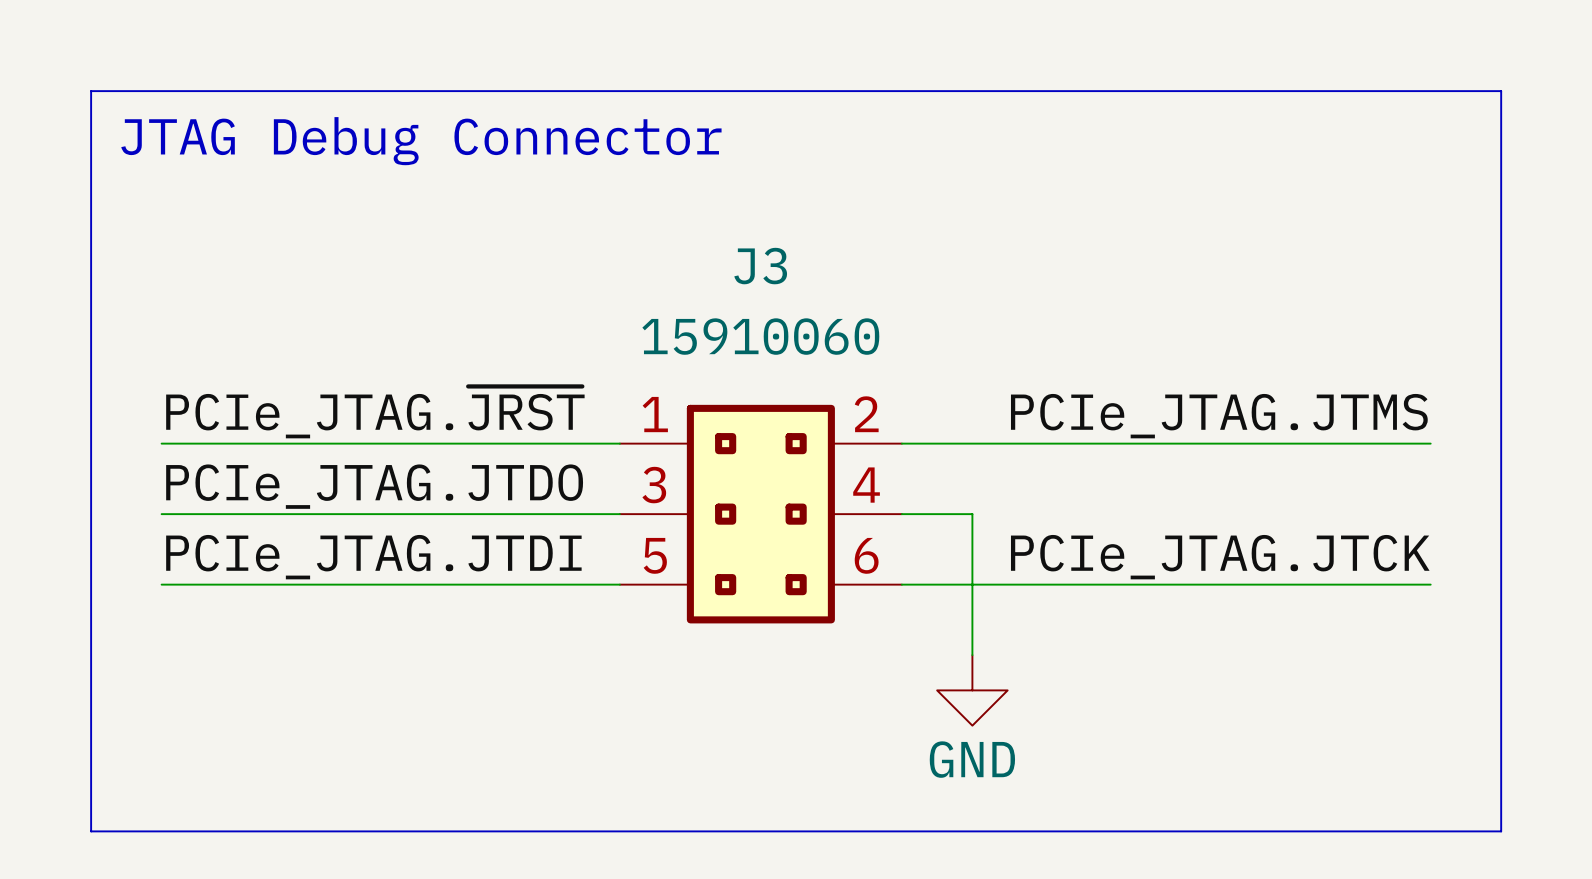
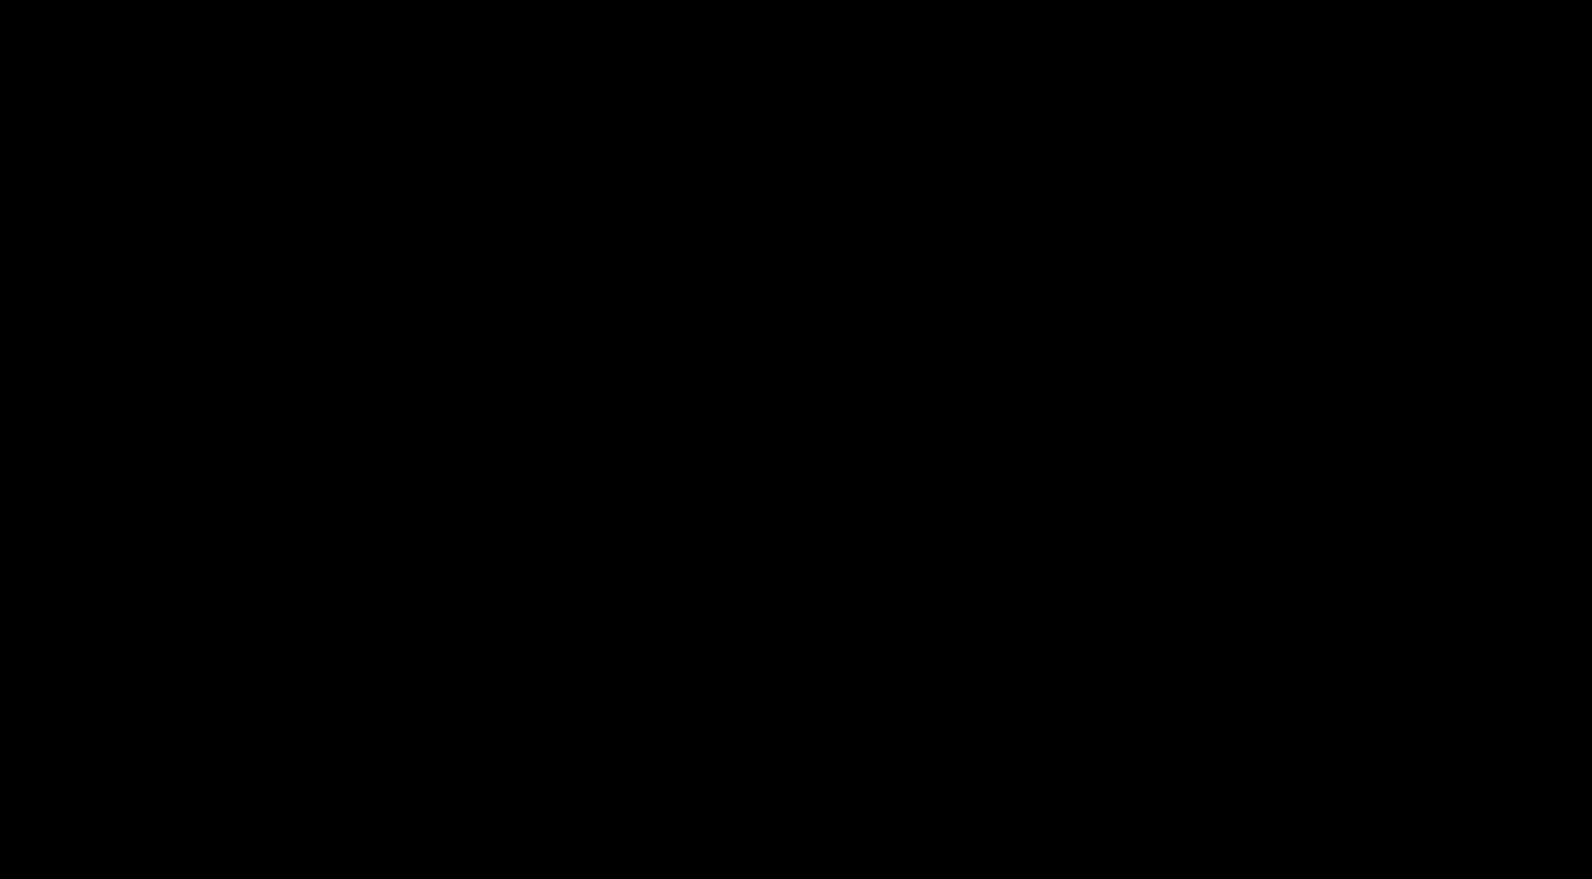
line: (91, 91) (1501, 91) (1501, 831) (91, 831) (91, 91) -> none
text: JTAG Debug Connector (421, 141) -> none
label: PCIe_JTAG.~{JRST} (375, 412) -> none
label: PCIe_JTAG.JTMS (1219, 416) -> none
wire: (161, 443) (619, 443) -> none
wire: (901, 443) (1430, 443) -> none
label: PCIe_JTAG.JTDO (374, 486) -> none
wire: (161, 514) (619, 514) -> none
J3: (760, 514) -> none
wire: (901, 514) (972, 514) (972, 655) -> none
label: PCIe_JTAG.JTDI (373, 557) -> none
label: PCIe_JTAG.JTCK (1220, 557) -> none
wire: (161, 584) (619, 584) -> none
wire: (901, 584) (1430, 584) -> none
power symbol: GND (972, 690) -> none

